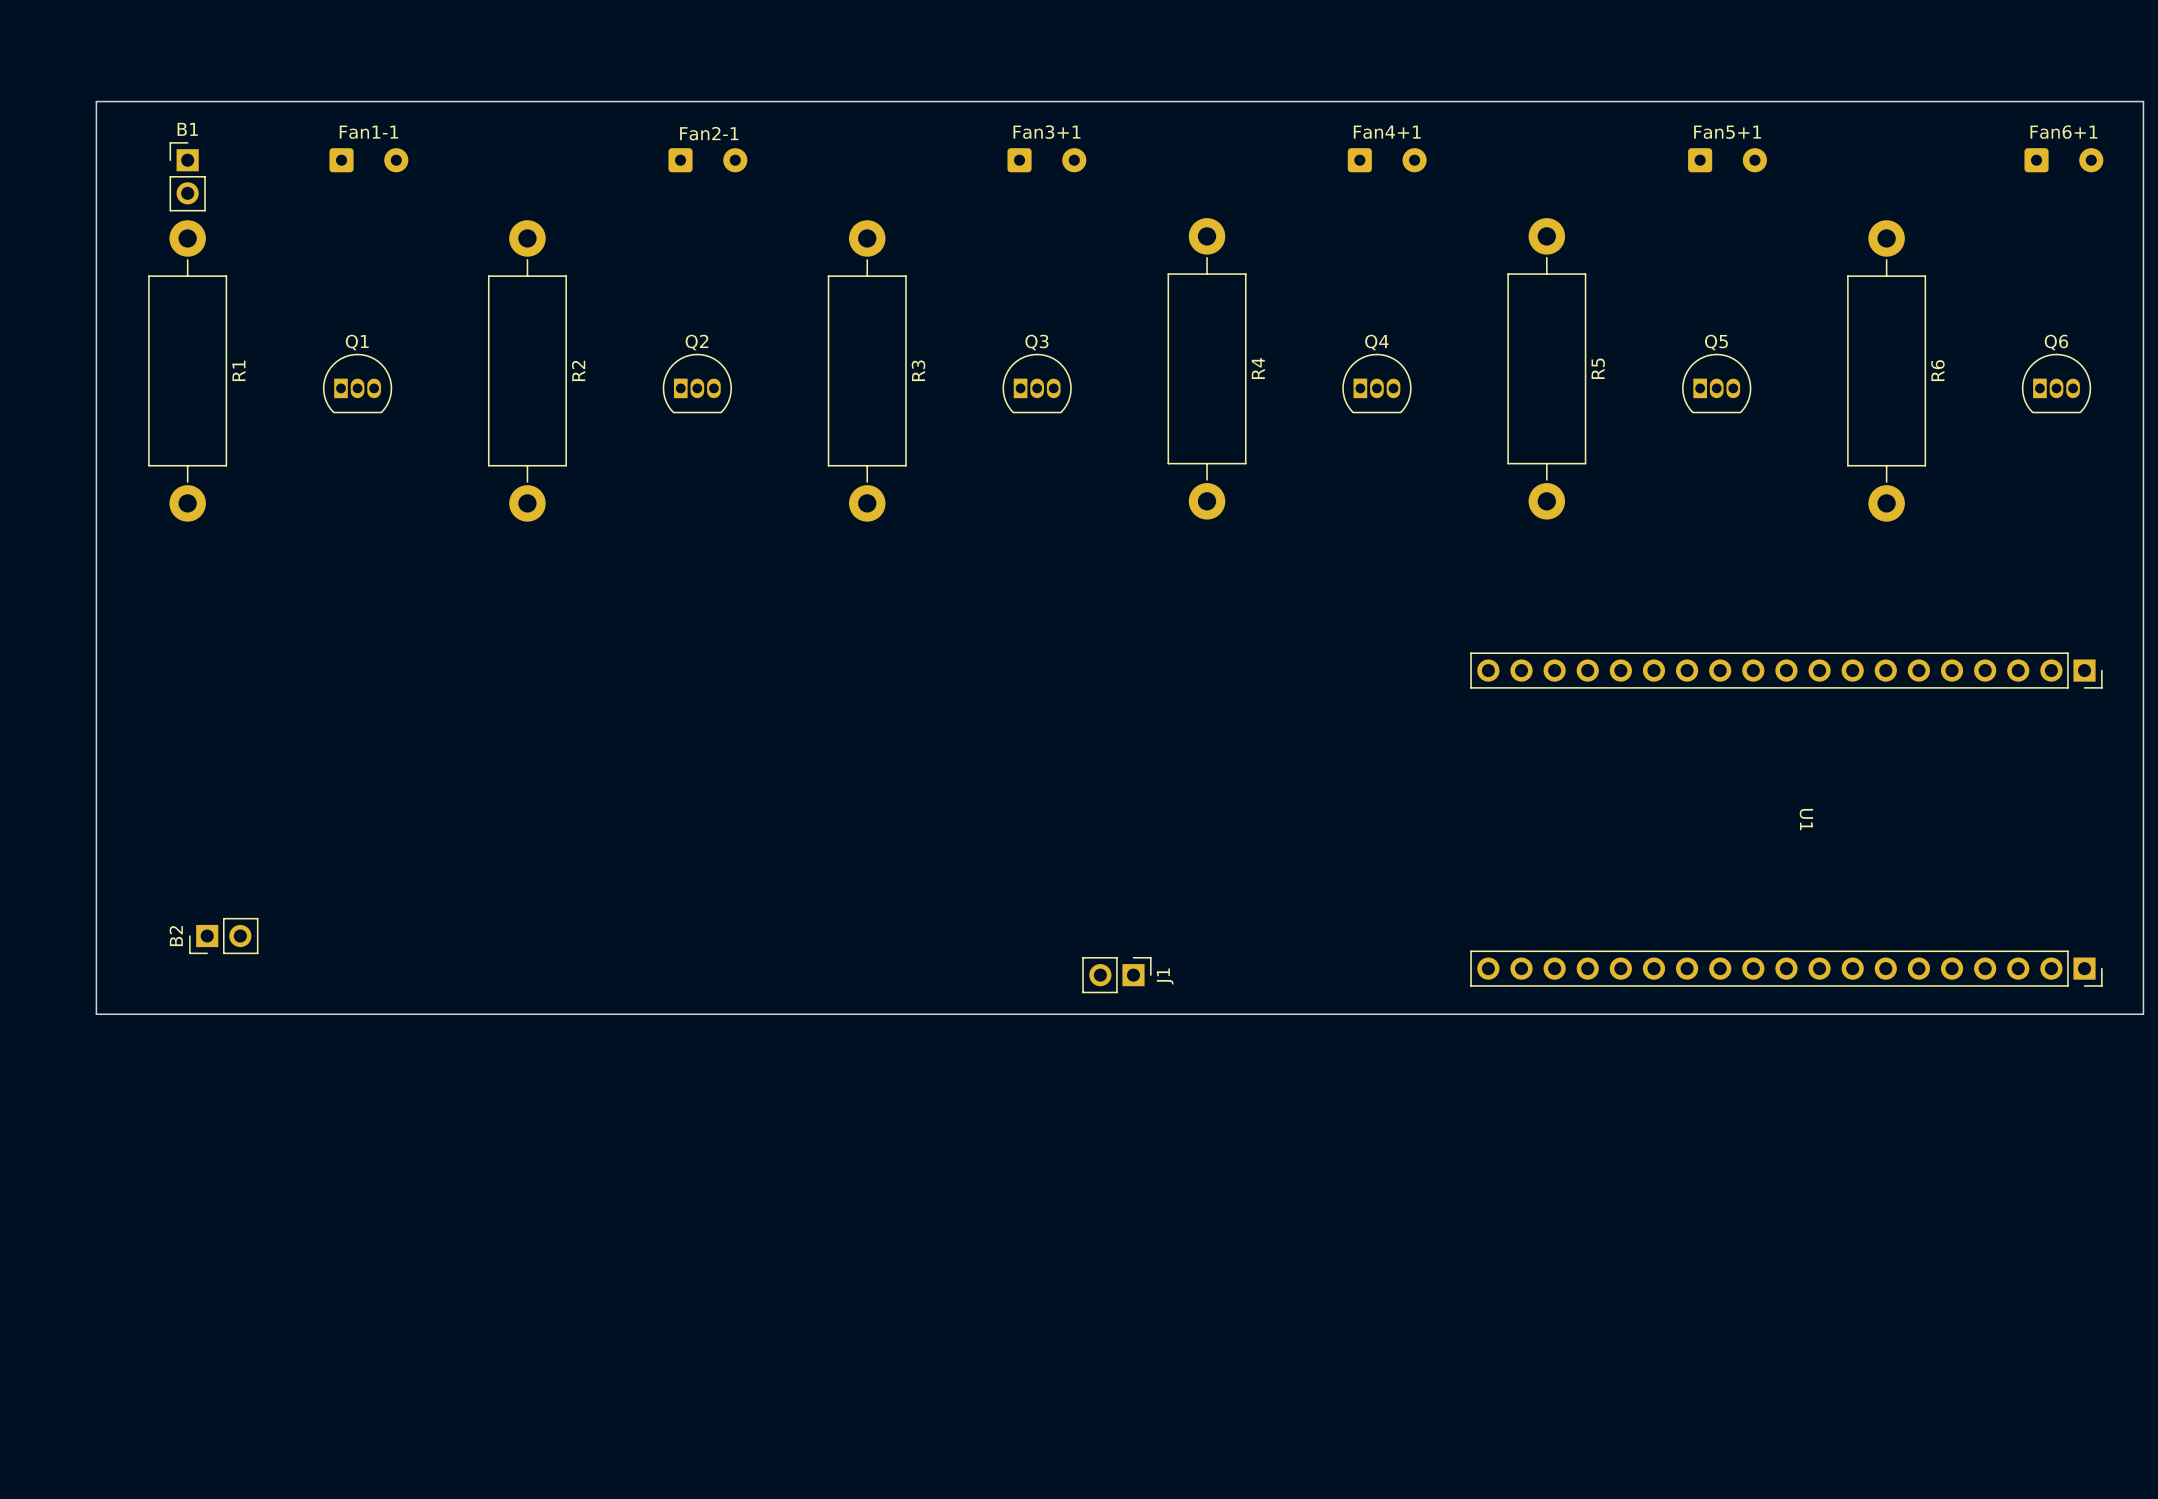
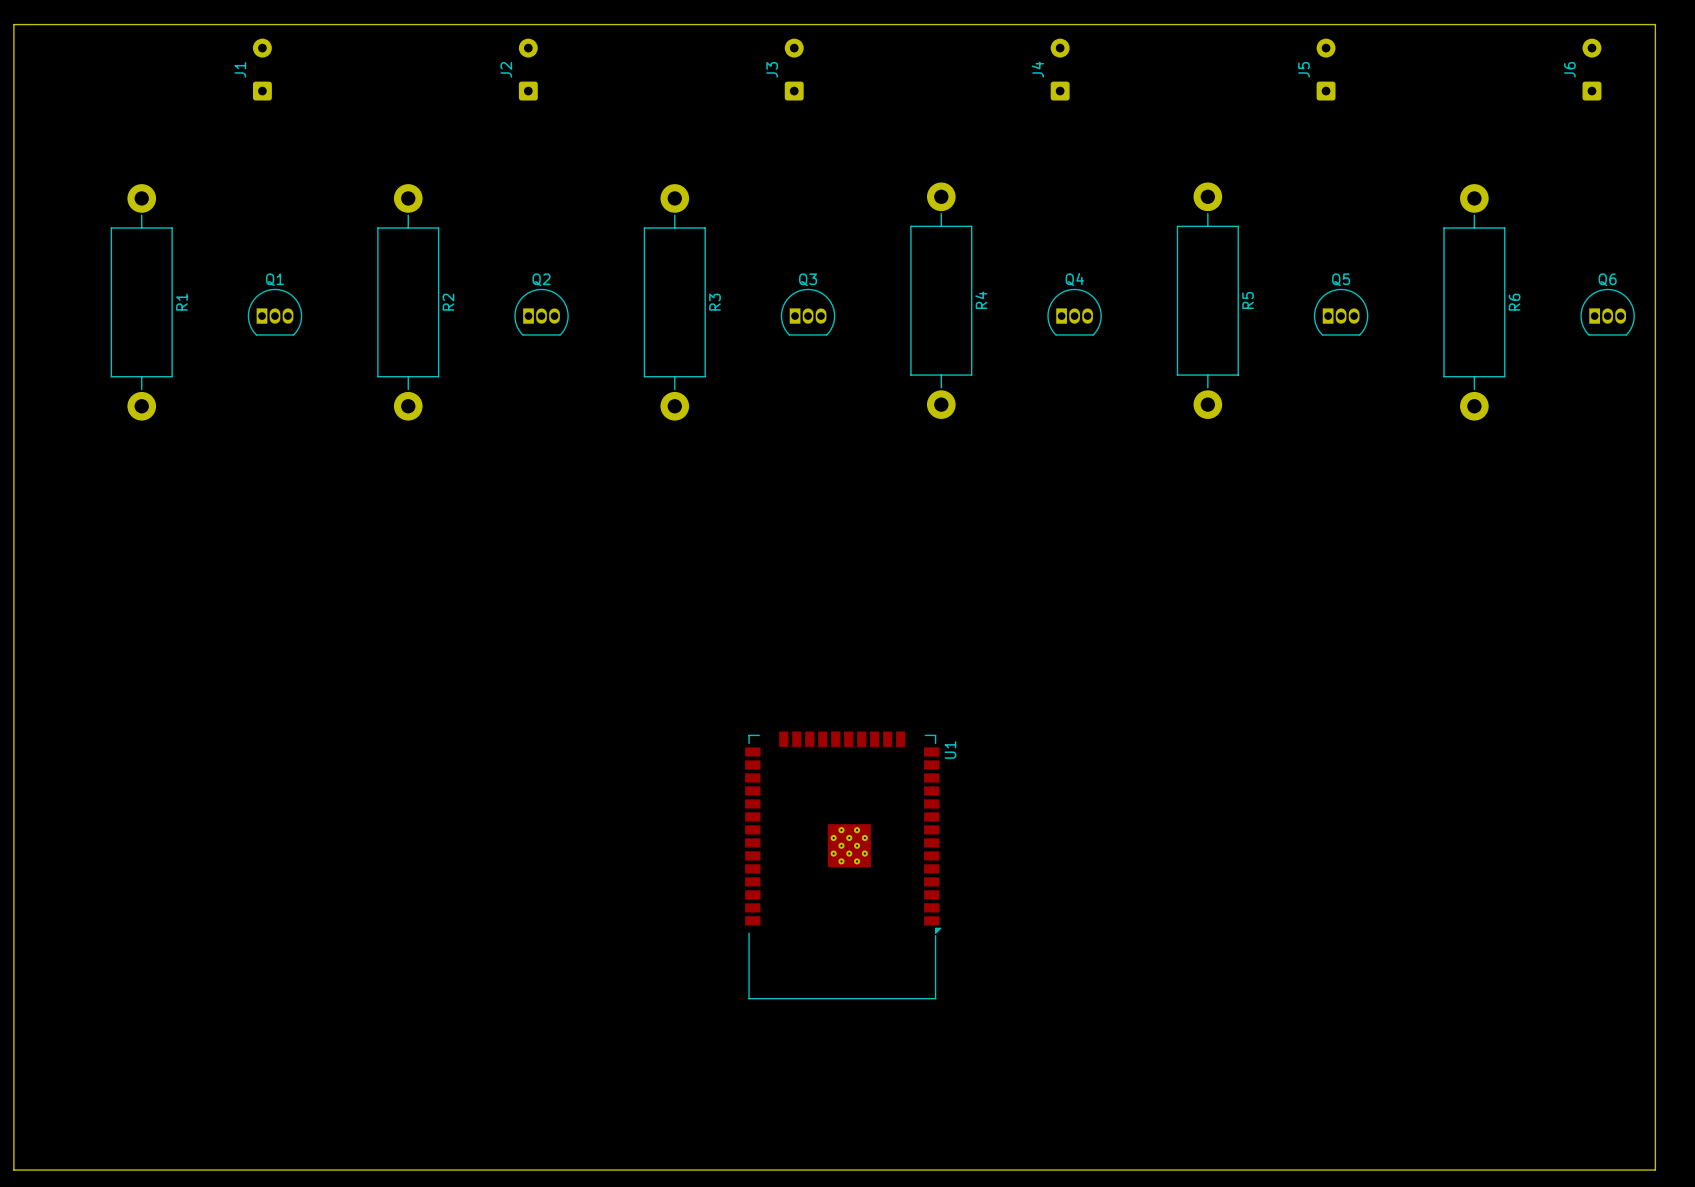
J2: none -> (528, 69)
J3: none -> (794, 69)
J4: none -> (1060, 69)
J5: none -> (1326, 69)
J6: none -> (1591, 69)
board edge: (96, 101) (2143, 101) (2143, 1014) (96, 1014) (96, 101) -> (13, 24) (13, 1170) (1655, 1170) (1655, 24) (13, 24)
Fan1-1: (368, 160) -> none
Fan2-1: (707, 160) -> none
Fan3+1: (1046, 160) -> none
Fan4+1: (1387, 160) -> none
Fan5+1: (1727, 160) -> none
Fan6+1: (2063, 160) -> none
B1: (187, 176) -> none
U1 footprint: [1470, 652, 2103, 987] -> [745, 731, 942, 1000]
U1 name position: U1 (1806, 819) -> U1 (950, 750)
B2: (223, 936) -> none
J1 footprint: [1082, 957, 1152, 994] -> [252, 38, 272, 101]
J1 name position: J1 (1165, 976) -> J1 (240, 69)

